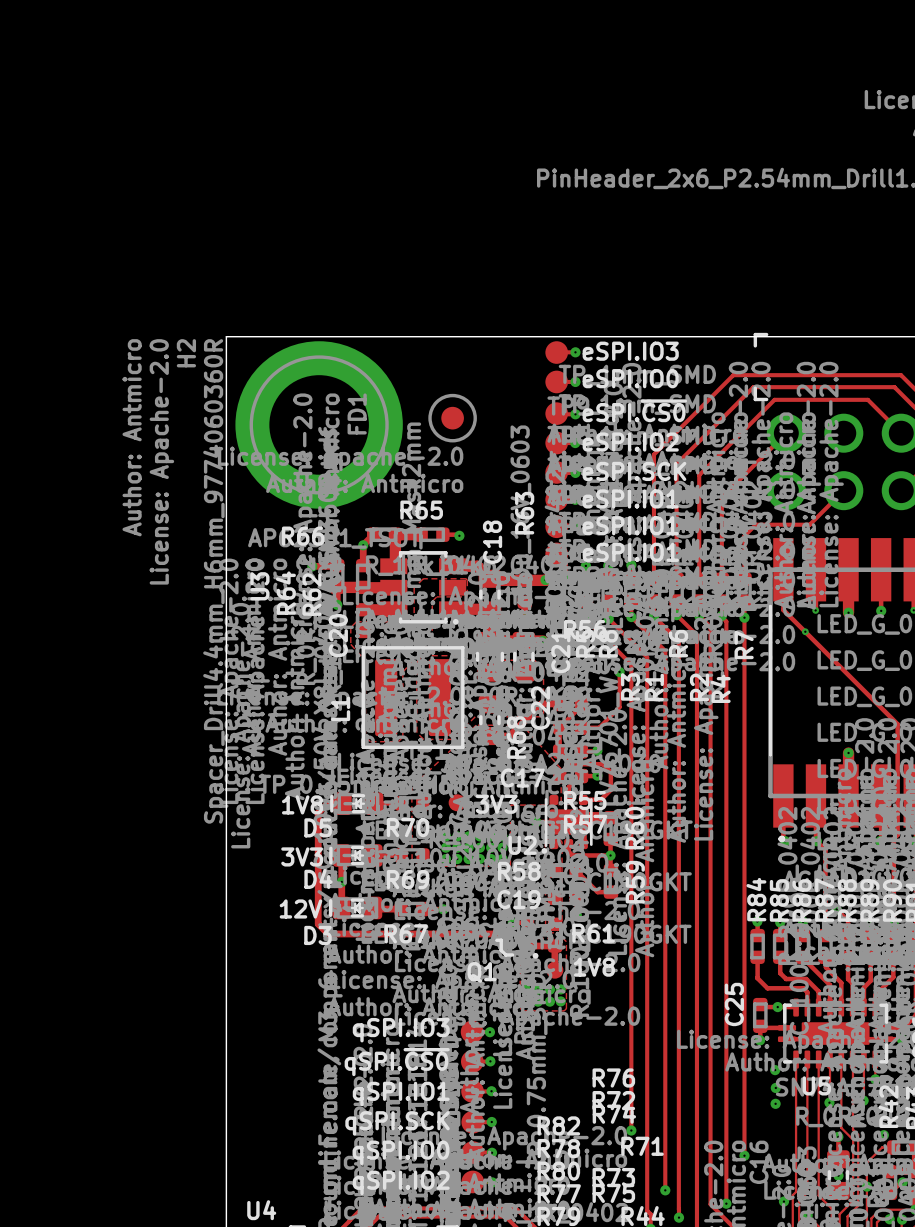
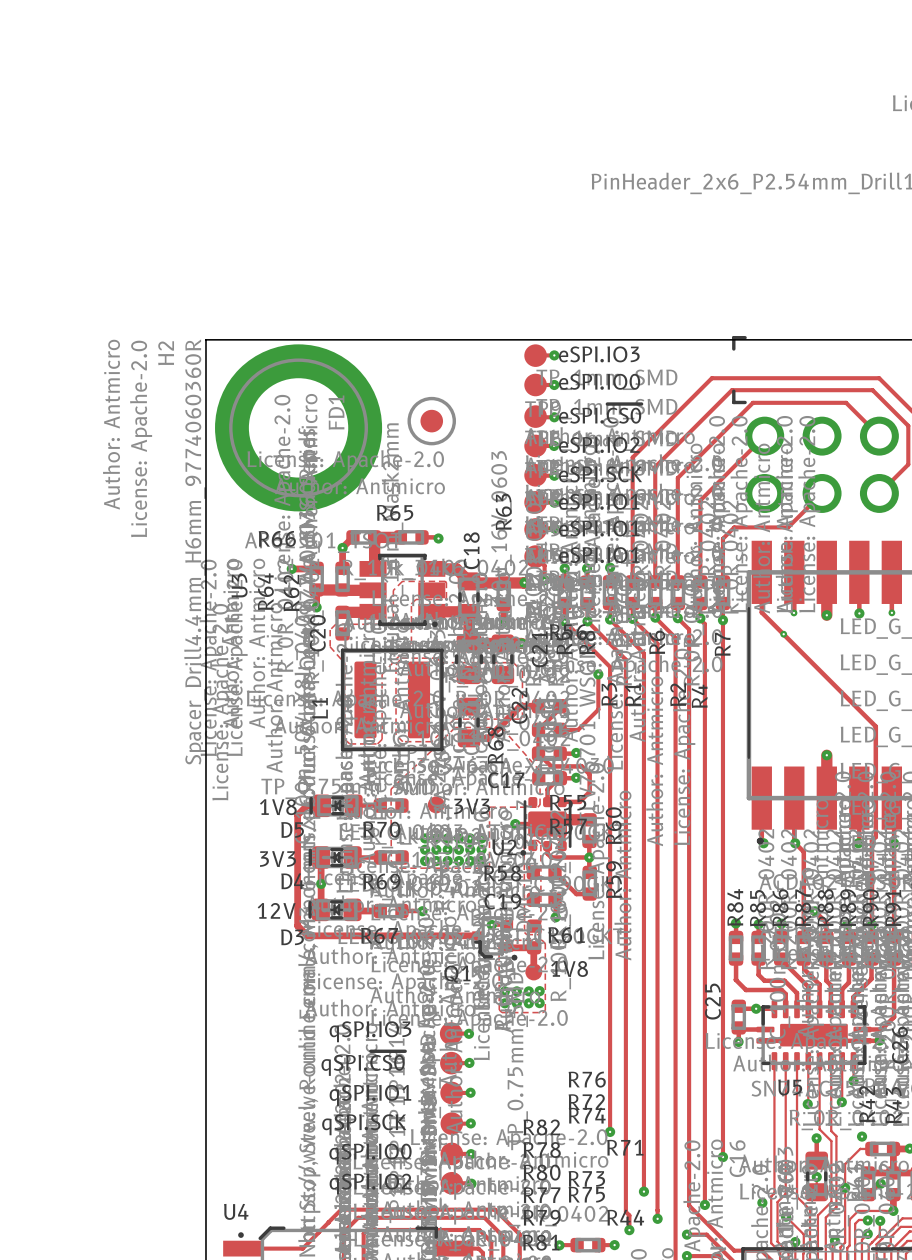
via: (775, 1070) -> none
via: (775, 1087) -> none
via: (775, 1103) -> none

